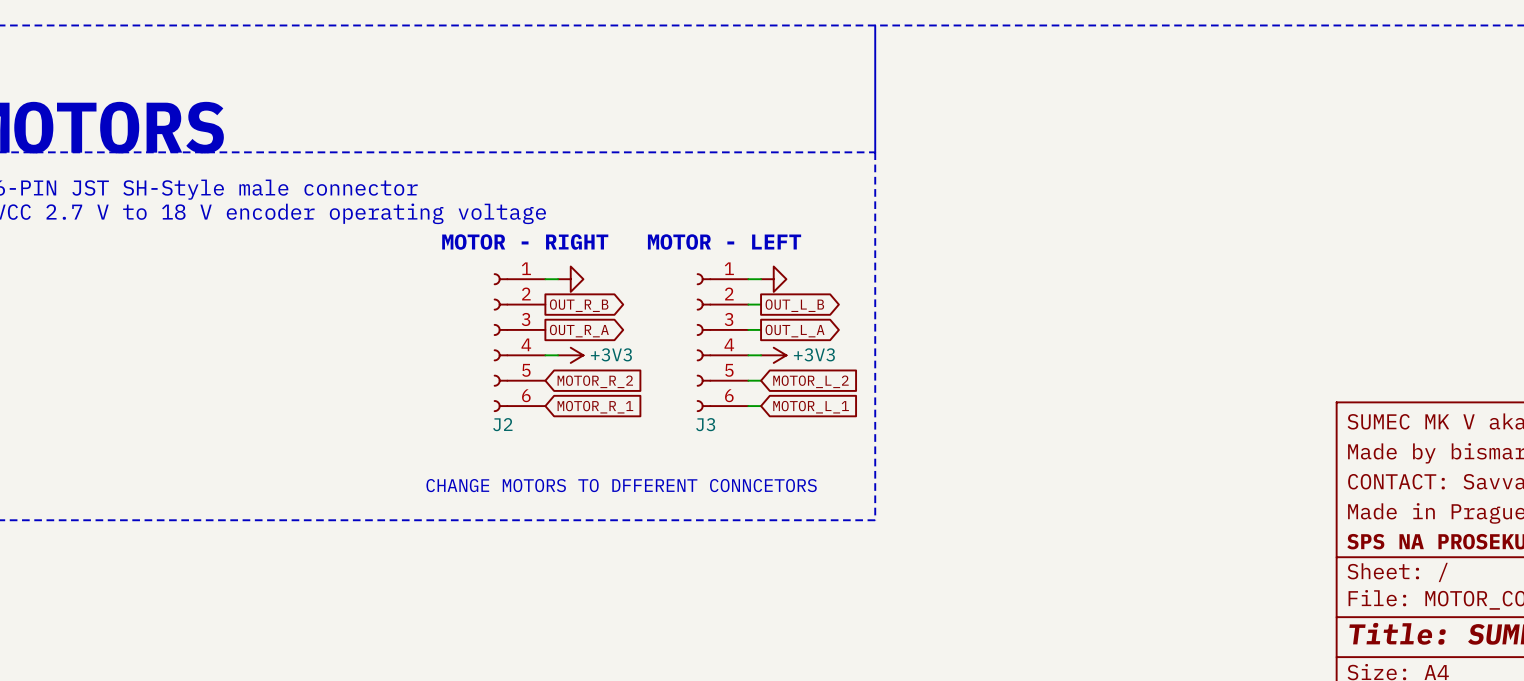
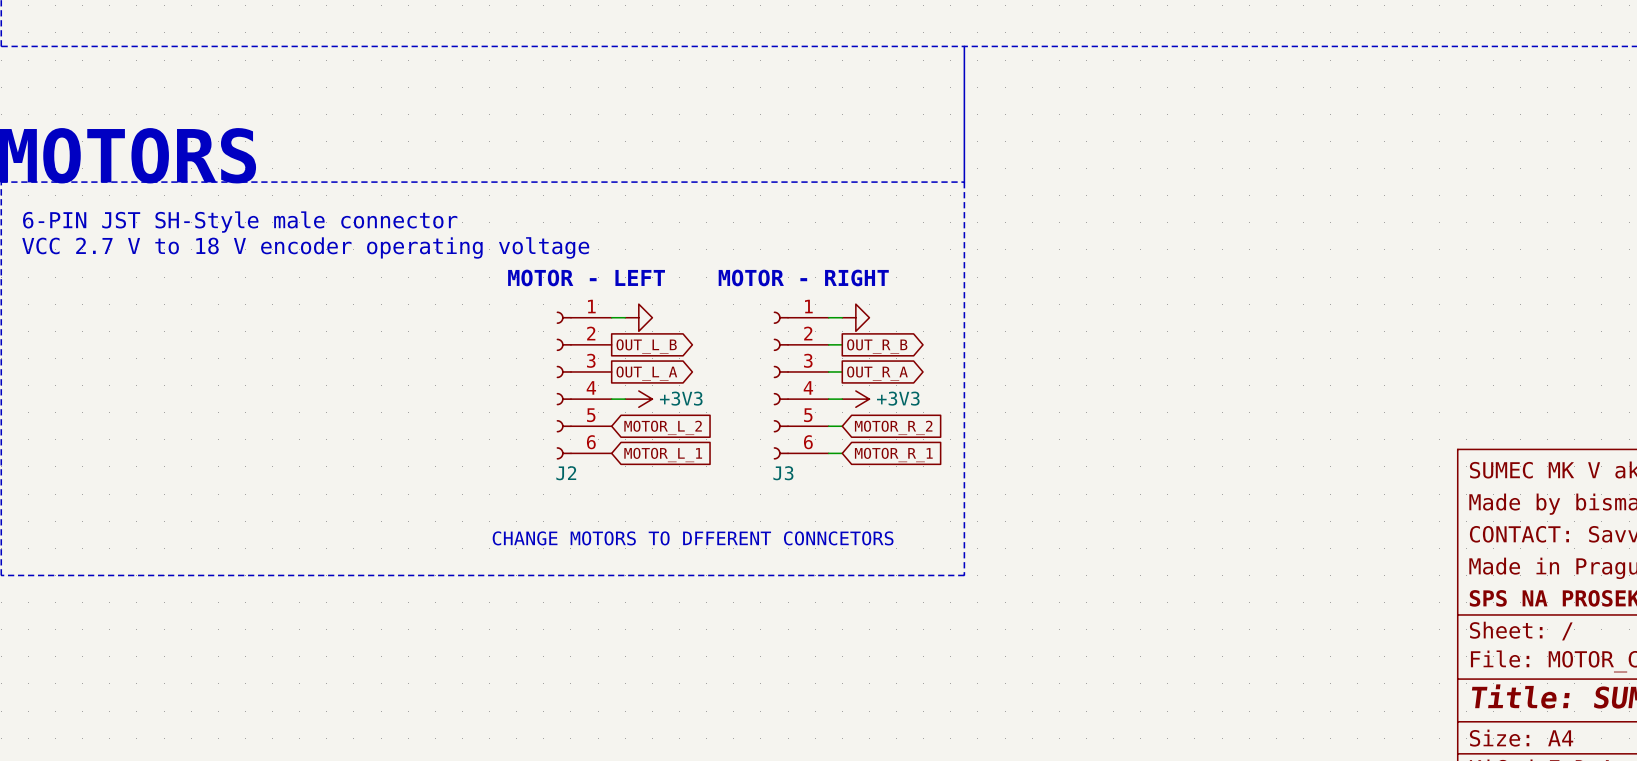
text: MOTOR - RIGHT (525, 242) -> MOTOR - LEFT (586, 277)
text: MOTOR - LEFT (724, 242) -> MOTOR - RIGHT (803, 277)
global label: OUT_R_B (579, 305) -> OUT_L_B (646, 346)
global label: OUT_L_B (794, 305) -> OUT_R_B (877, 346)
global label: OUT_R_A (579, 331) -> OUT_L_A (646, 373)
global label: OUT_L_A (795, 331) -> OUT_R_A (877, 373)
global label: MOTOR_R_2 (595, 381) -> MOTOR_L_2 (663, 427)
global label: MOTOR_L_2 (810, 381) -> MOTOR_R_2 (893, 427)
global label: MOTOR_R_1 (595, 407) -> MOTOR_L_1 (663, 455)
global label: MOTOR_L_1 (811, 407) -> MOTOR_R_1 (893, 455)

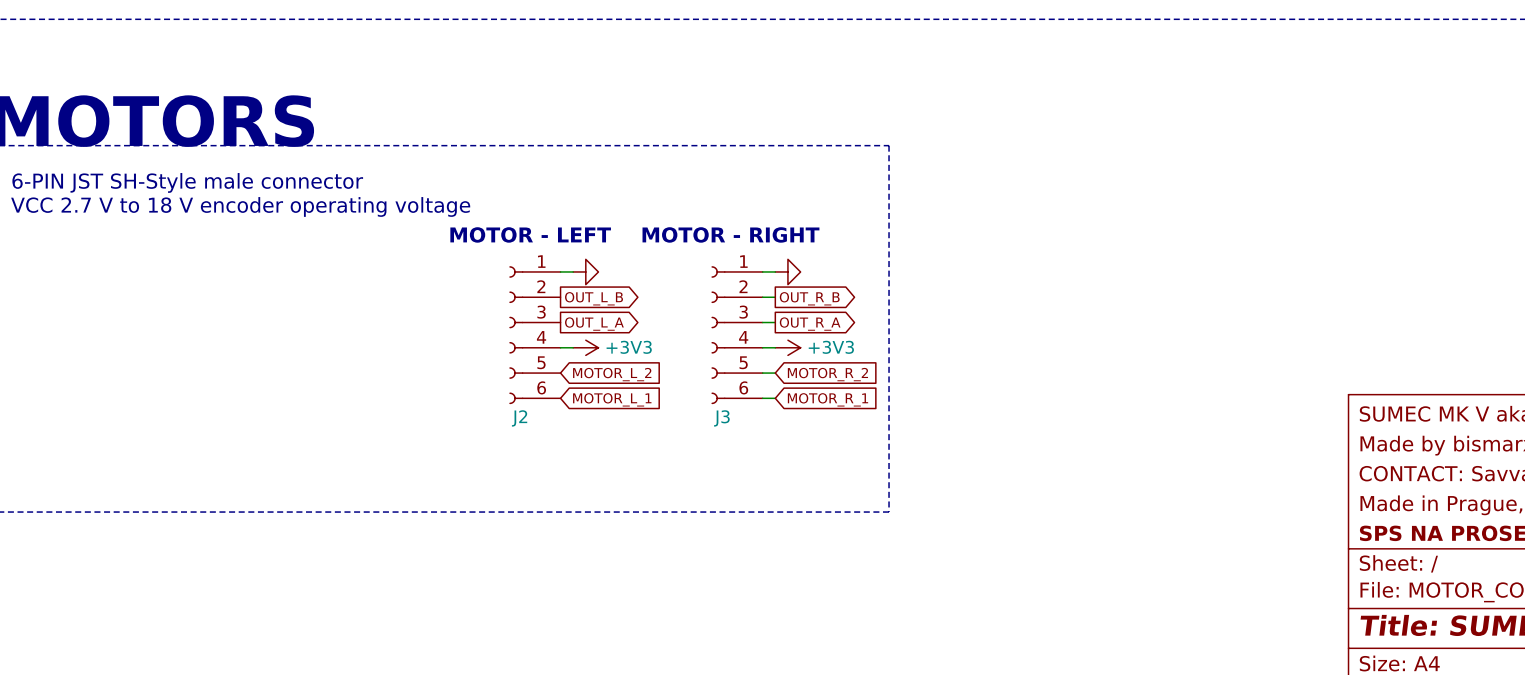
line: (964, 46) (964, 182) -> none
text: CHANGE MOTORS TO DFFERENT CONNCETORS (693, 538) -> none

